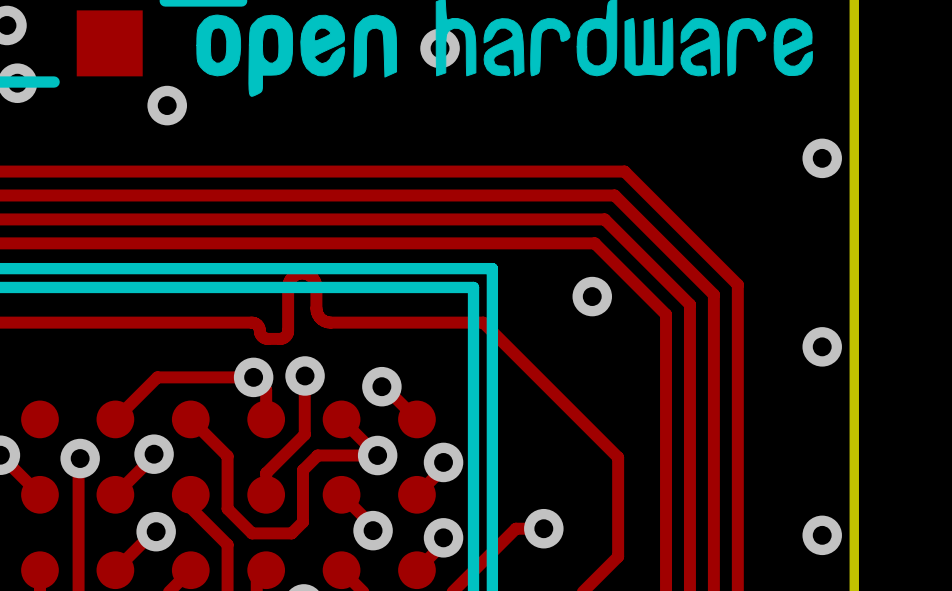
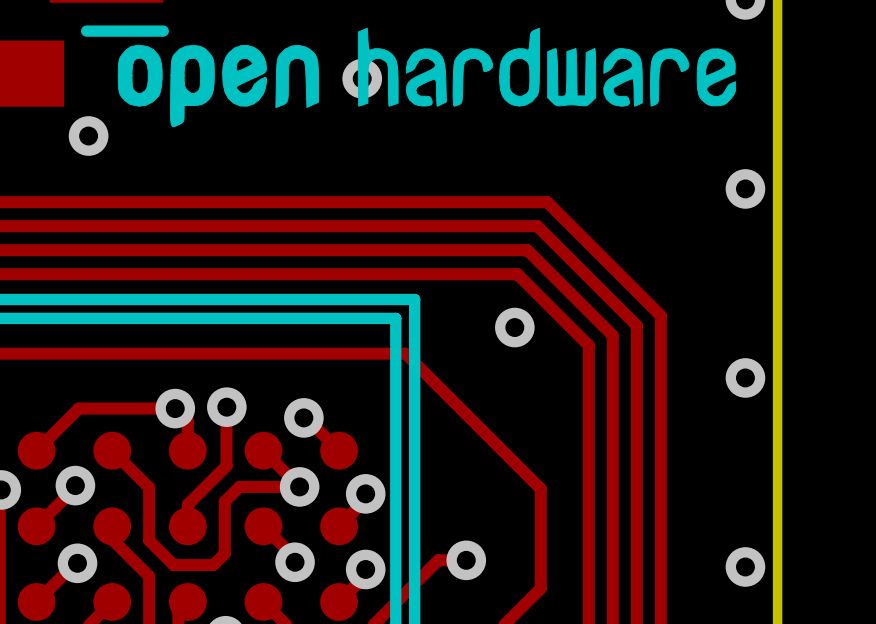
track: (330, 322) (324, 321) (317, 314) (316, 284) (313, 278) (305, 273) (299, 273) (293, 276) (288, 284) (288, 330) -> (252, 353) (173, 353)
track: (259, 328) (260, 332) -> none
track: (268, 338) (279, 338) -> none

